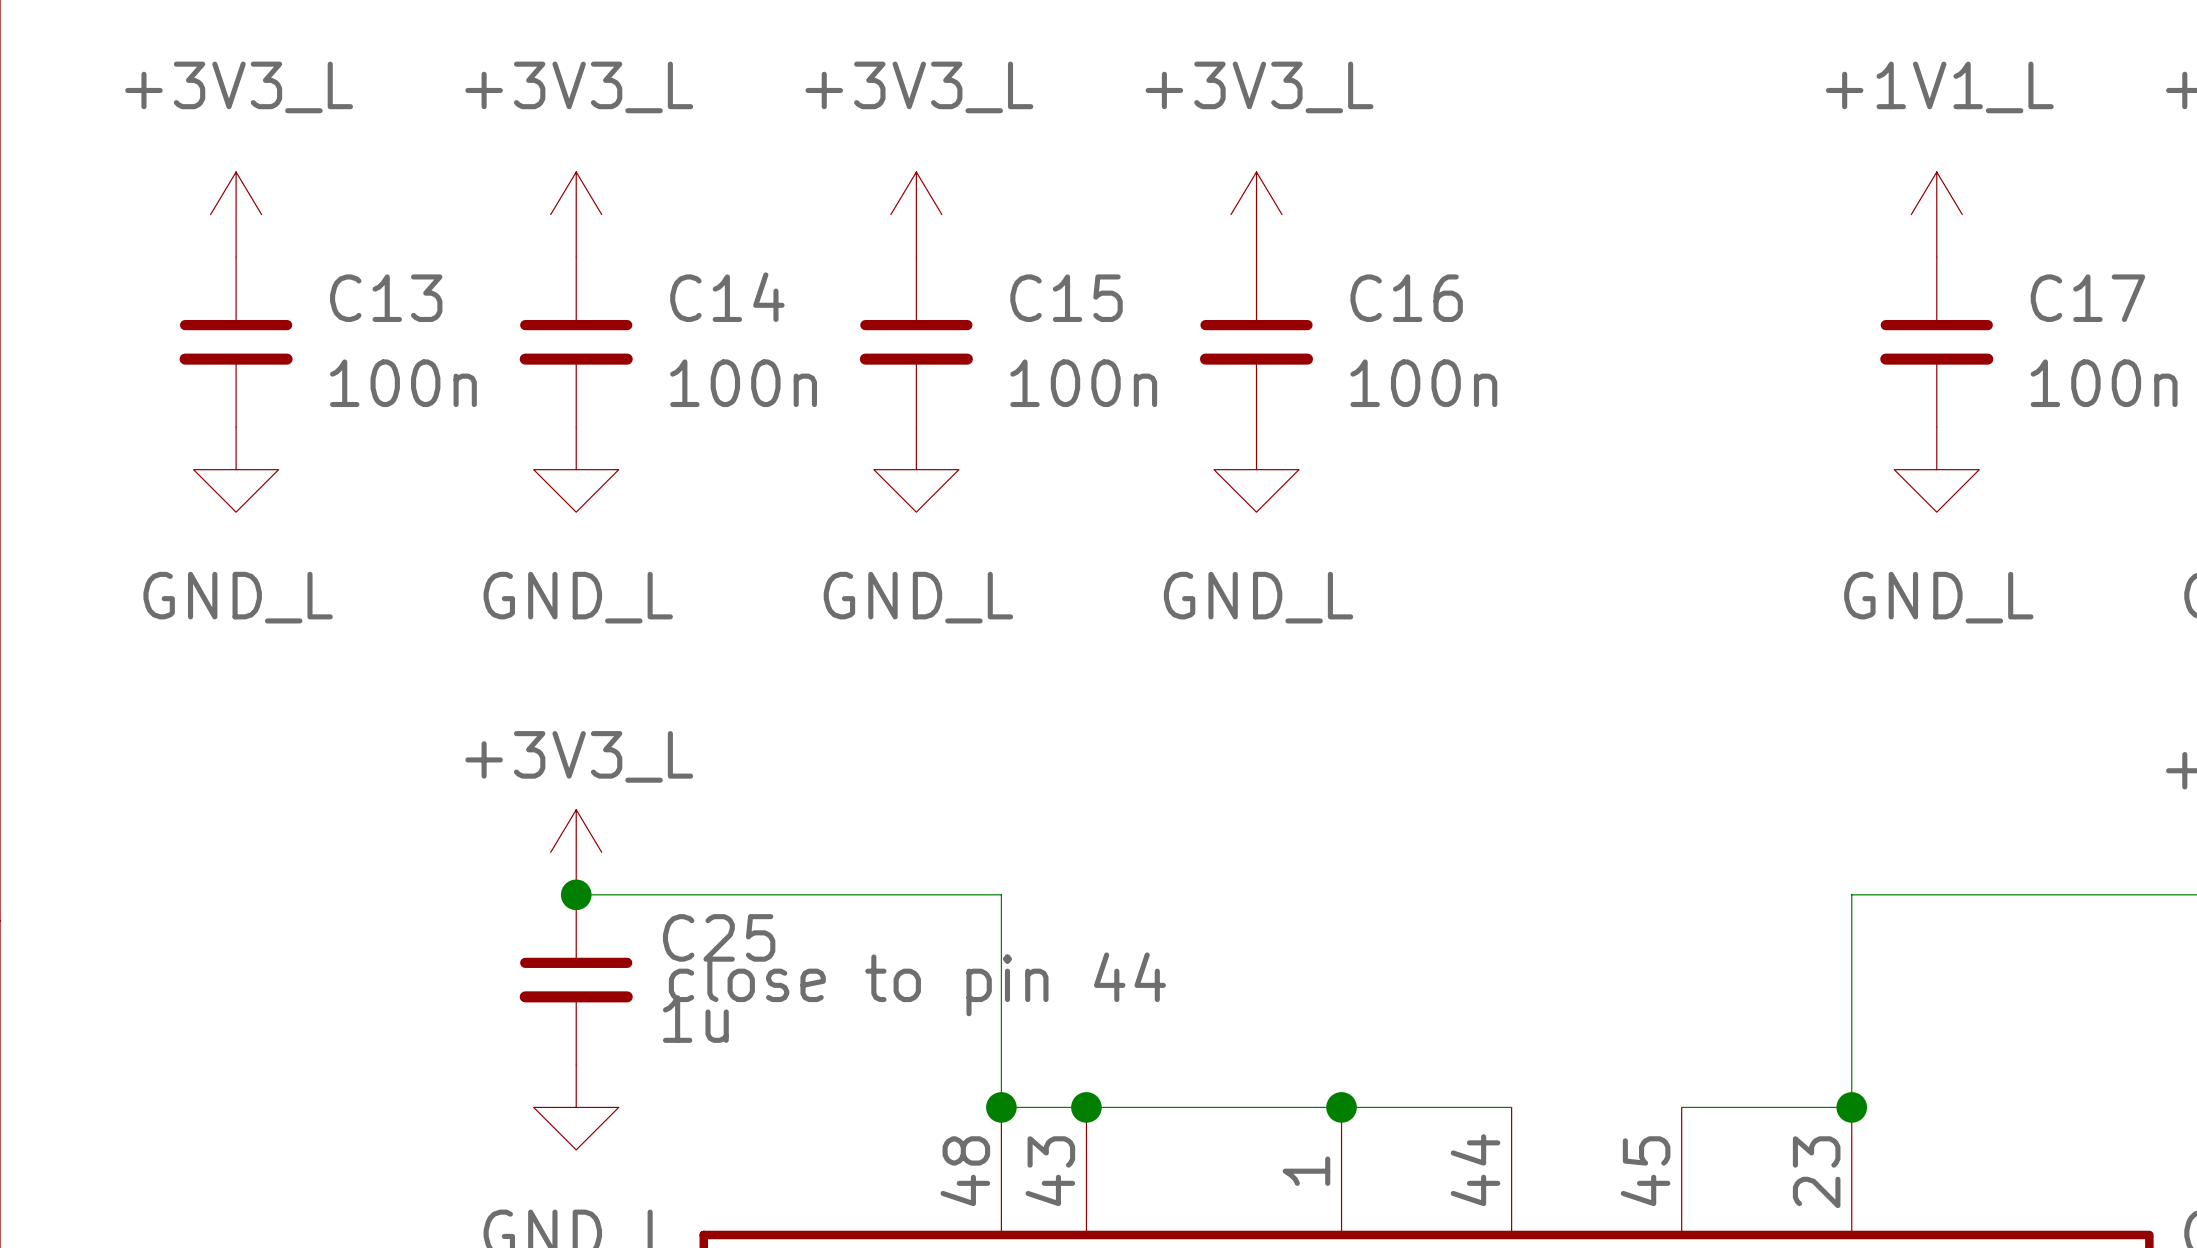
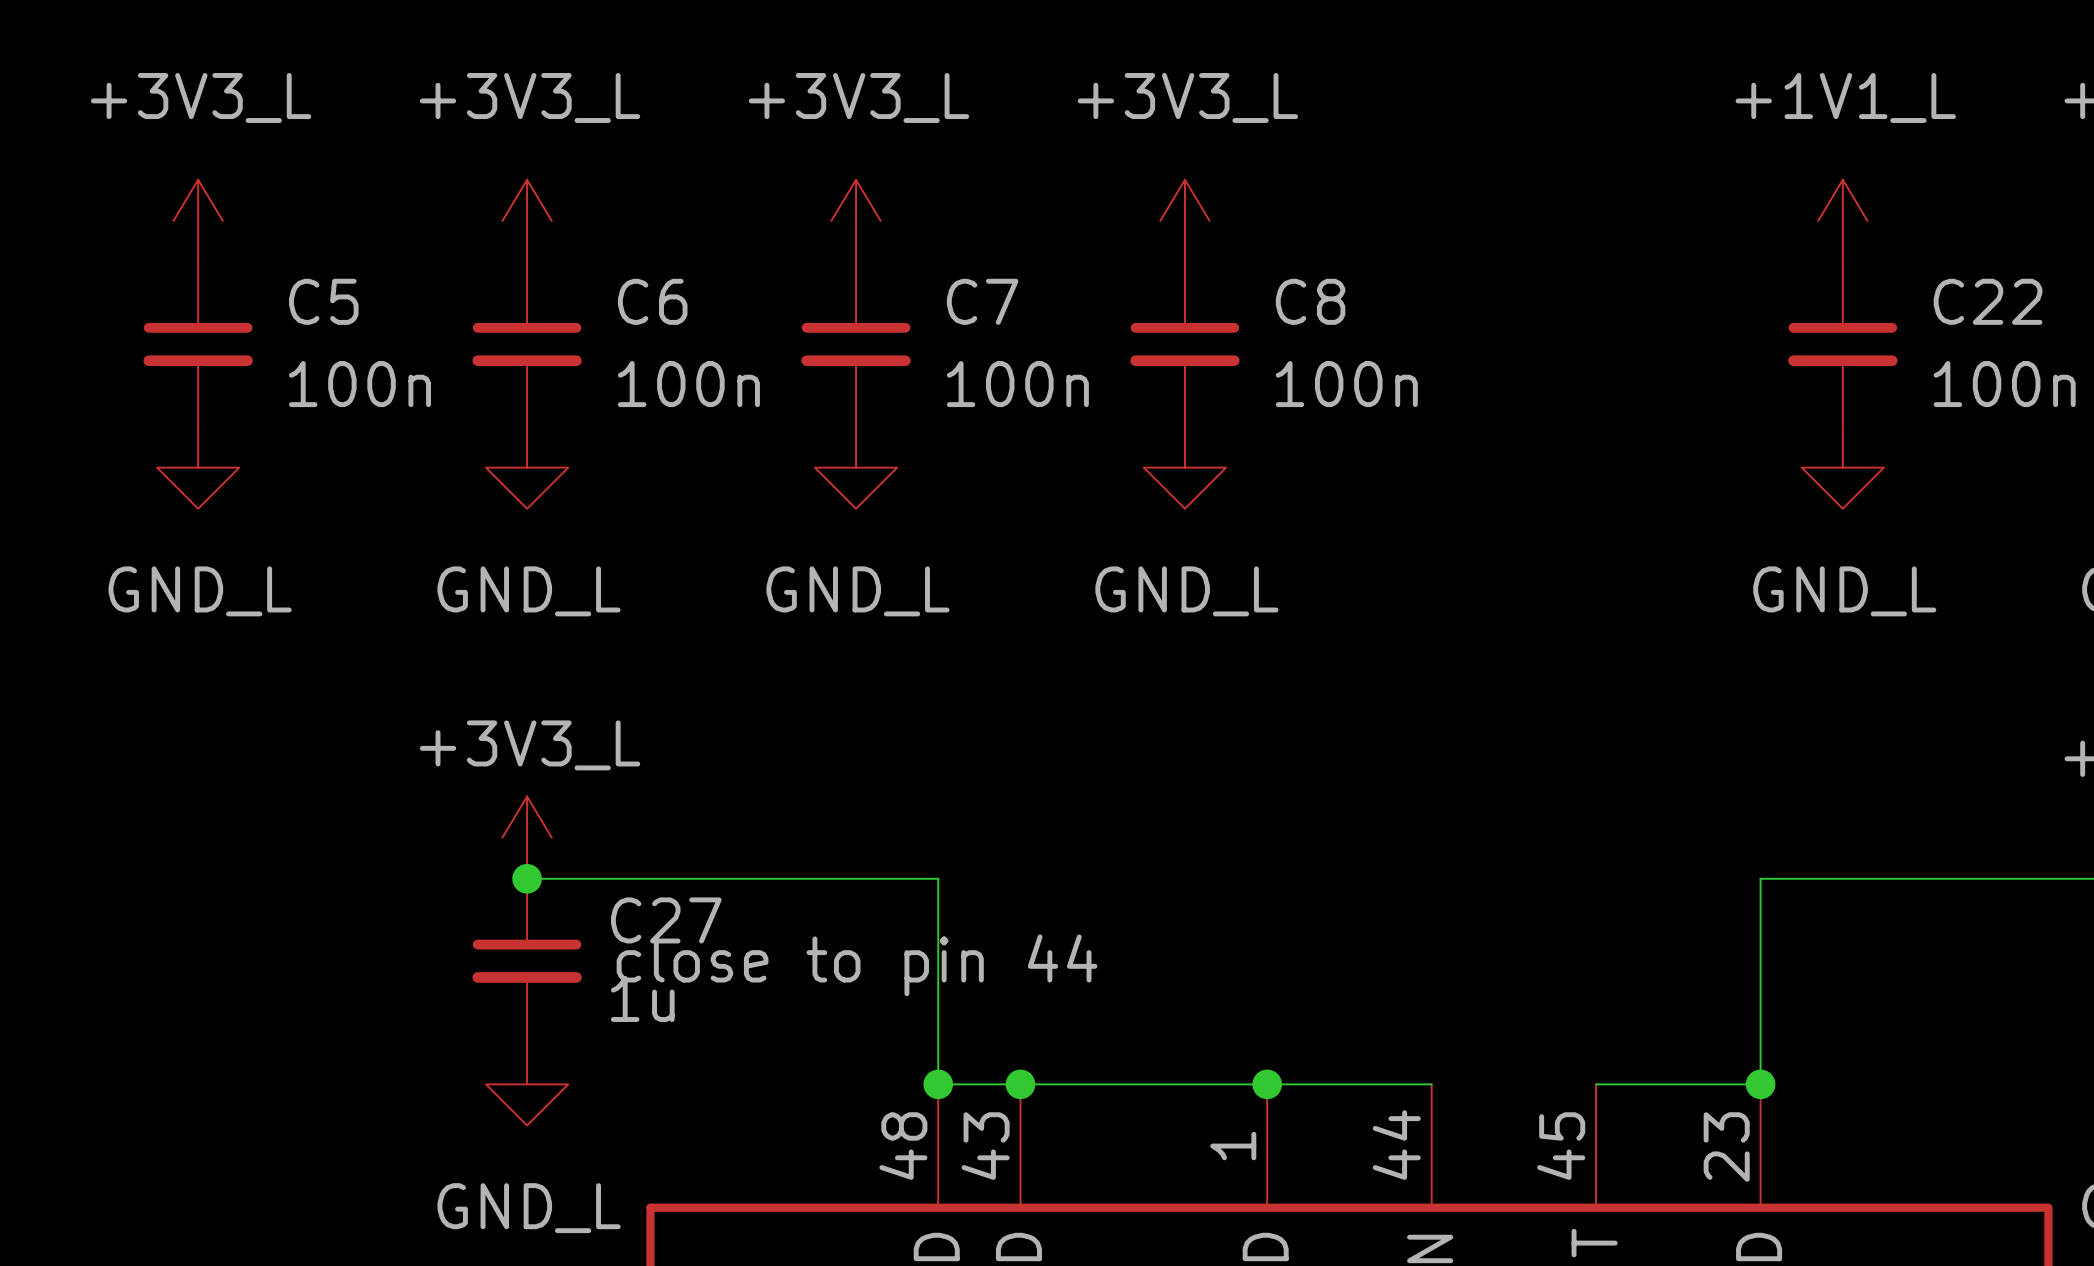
C14 name: C14 (727, 297) -> C6 (652, 301)
C13 name: C13 (386, 298) -> C5 (323, 301)
C15 name: C15 (1066, 298) -> C7 (982, 301)
C16 name: C16 (1406, 298) -> C8 (1310, 301)
C17 name: C17 (2087, 298) -> C22 (1988, 301)
C25 name: C25 (719, 937) -> C27 (666, 920)

